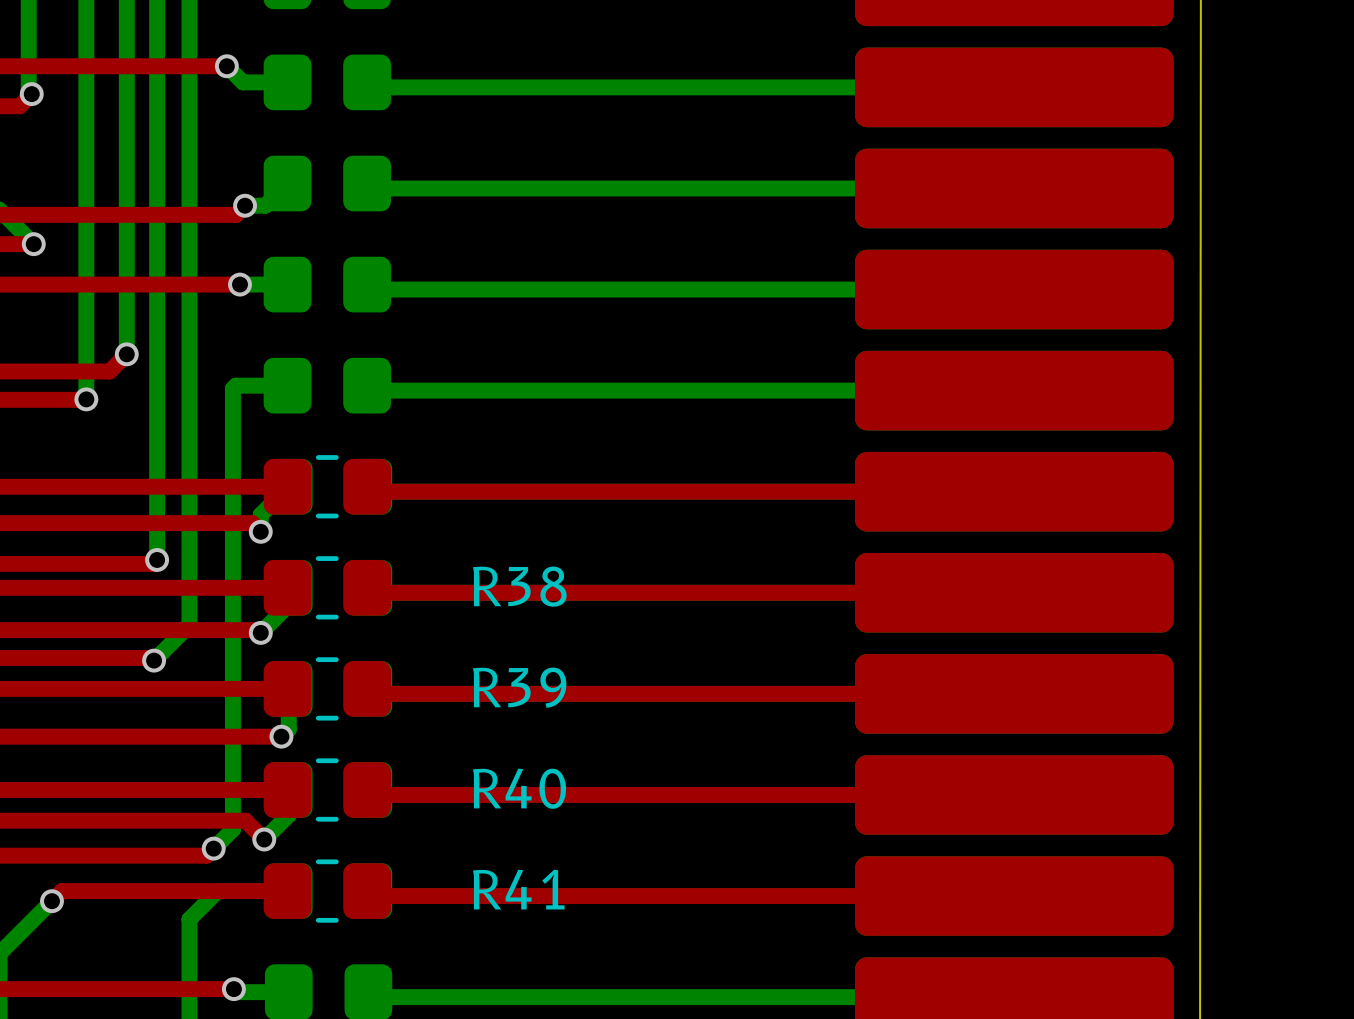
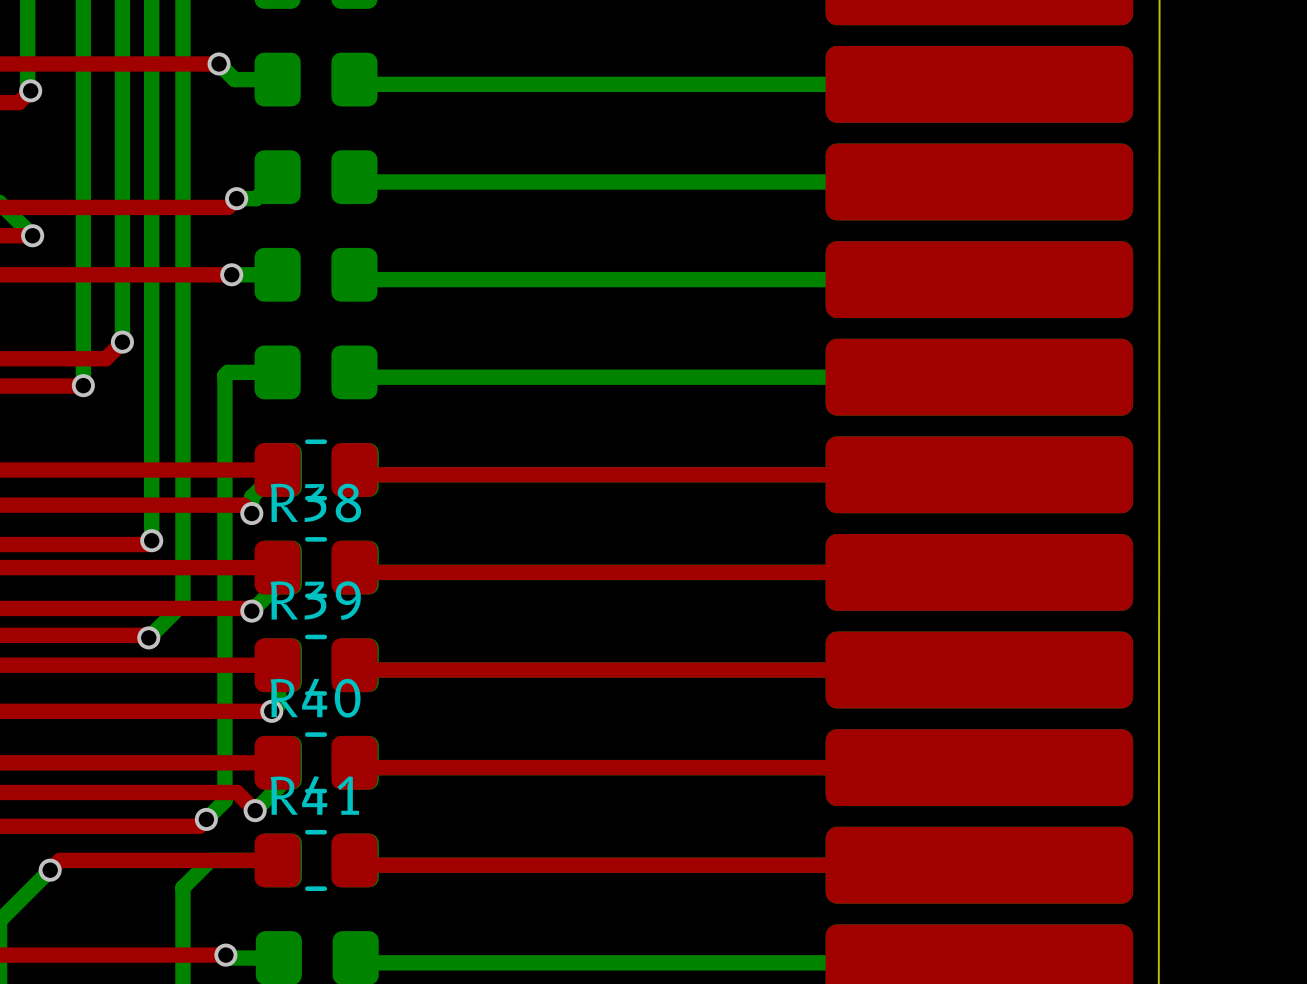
R38 name position: R38 (519, 586) -> R38 (315, 503)
R39 name position: R39 (519, 687) -> R39 (315, 600)
R40 name position: R40 (519, 788) -> R40 (315, 698)
R41 name position: R41 (518, 889) -> R41 (314, 795)

